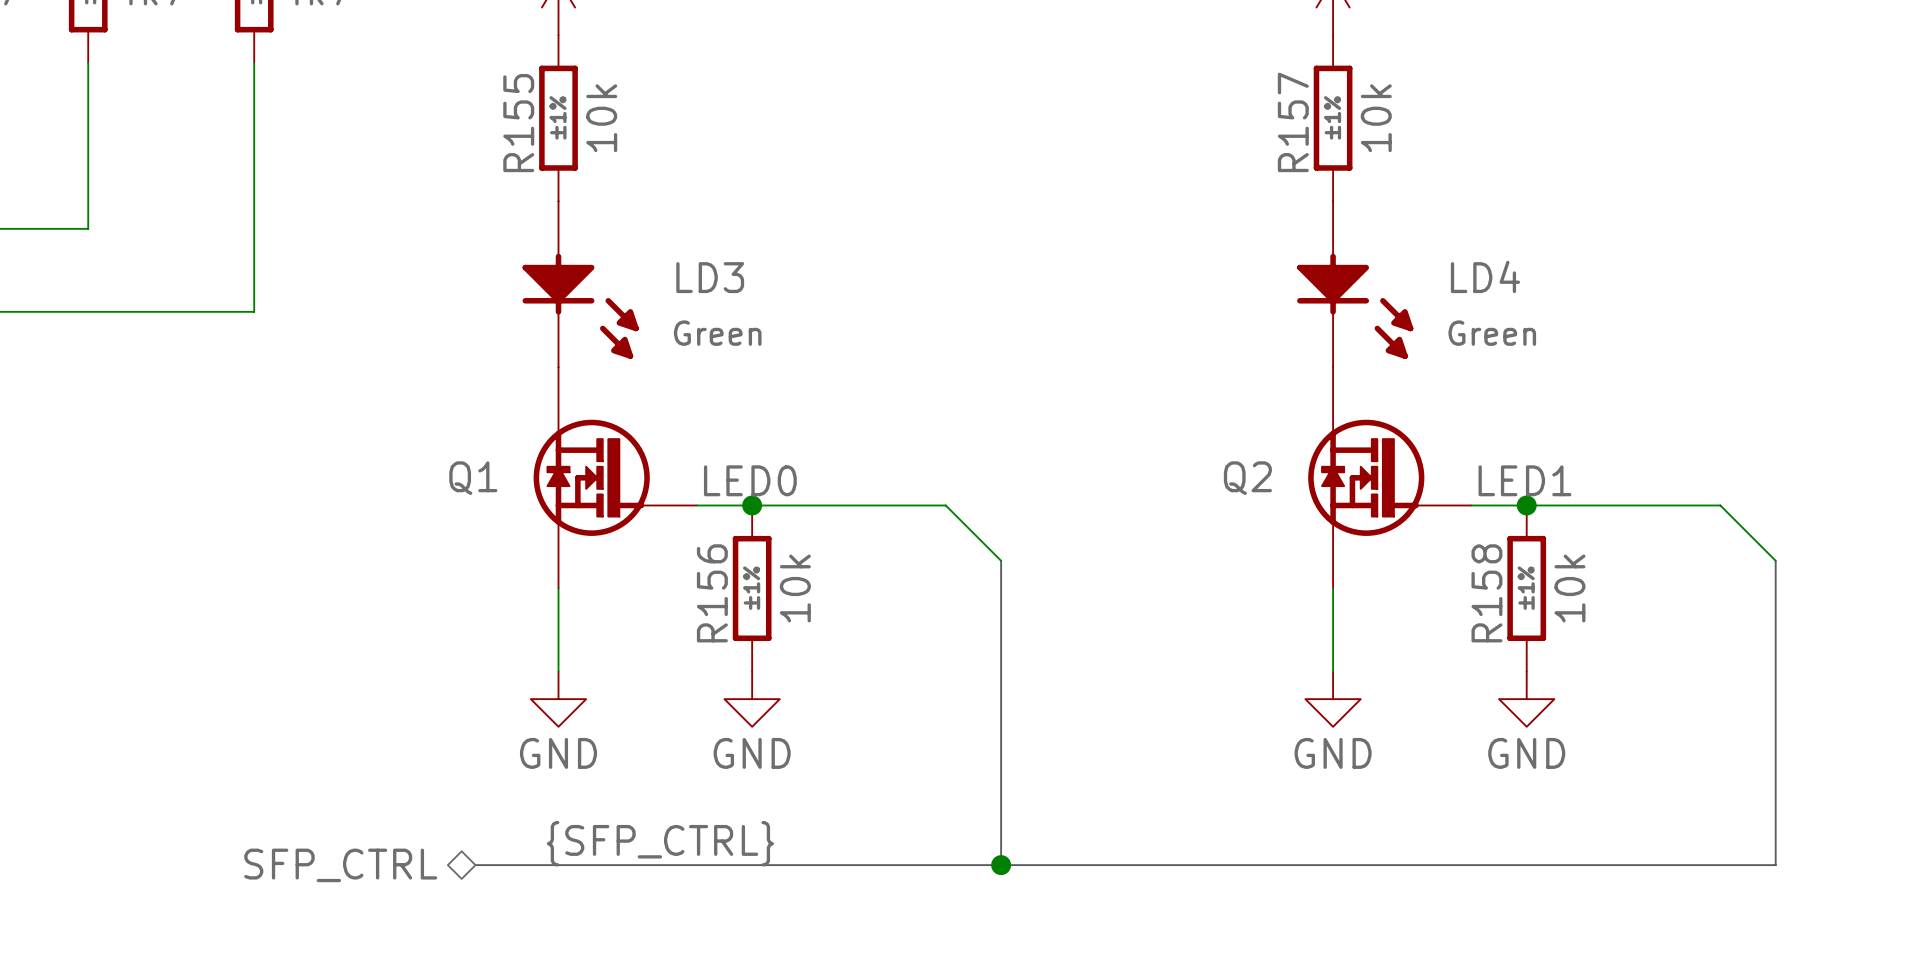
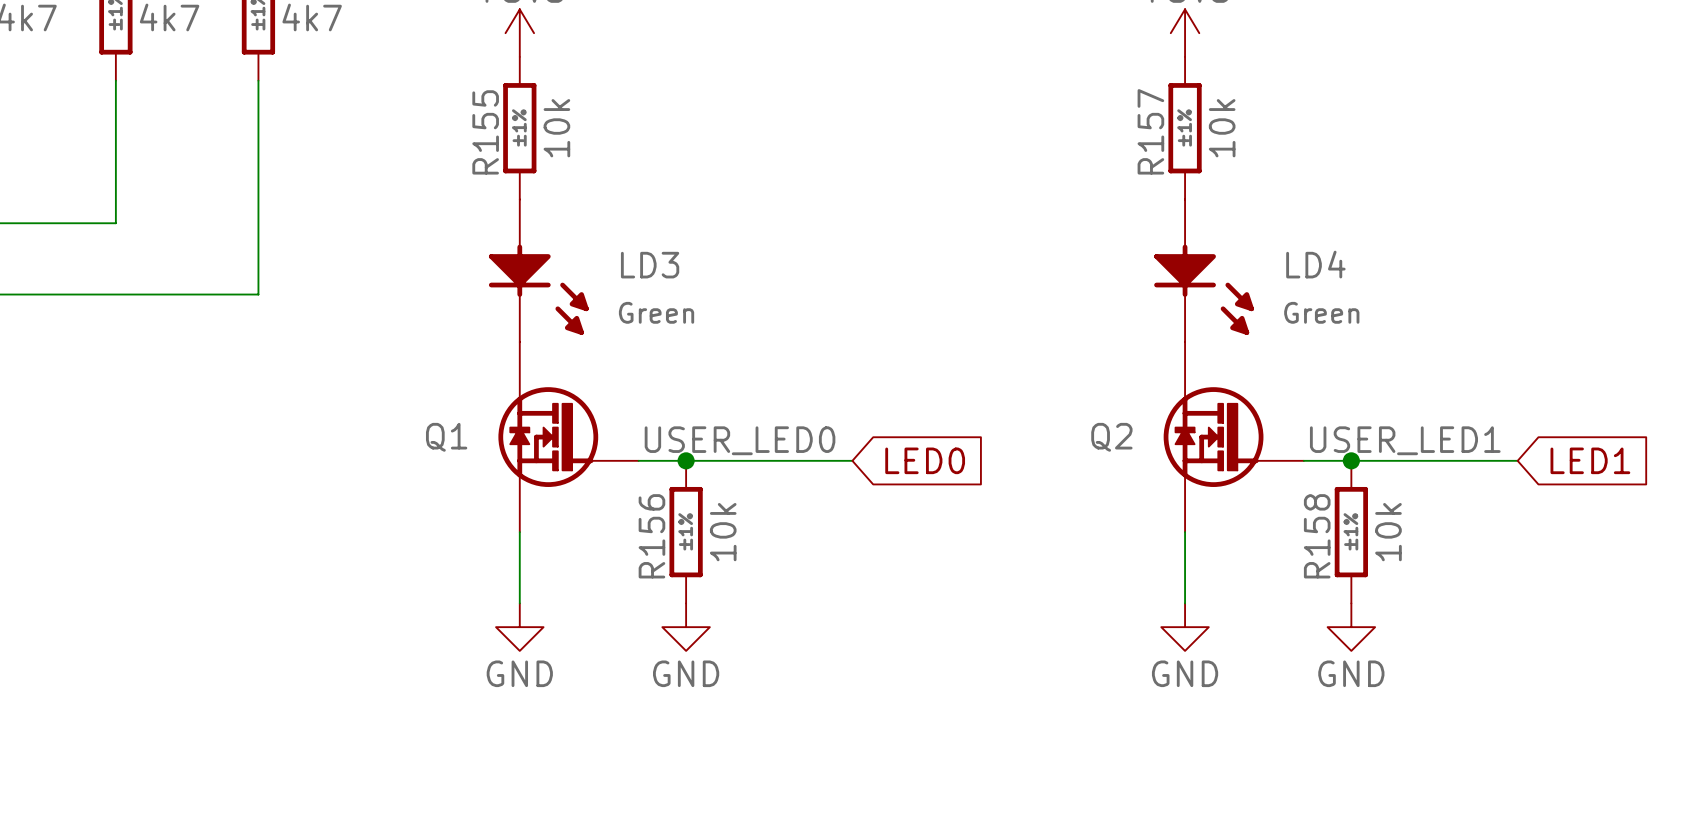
label: LED0 (750, 480) -> USER_LED0 (740, 440)
label: LED1 (1524, 480) -> USER_LED1 (1405, 440)
wire: (945, 505) (1001, 560) -> none
global label: none -> LED0 (925, 460)
wire: (1720, 505) (1775, 560) -> none
global label: none -> LED1 (1590, 460)
bus: (1001, 560) (1001, 865) -> none
bus: (1775, 560) (1775, 865) (475, 865) -> none
label: {SFP_CTRL} (660, 843) -> none
hierarchical label: SFP_CTRL (340, 865) -> none
junction: (1001, 865) -> none

